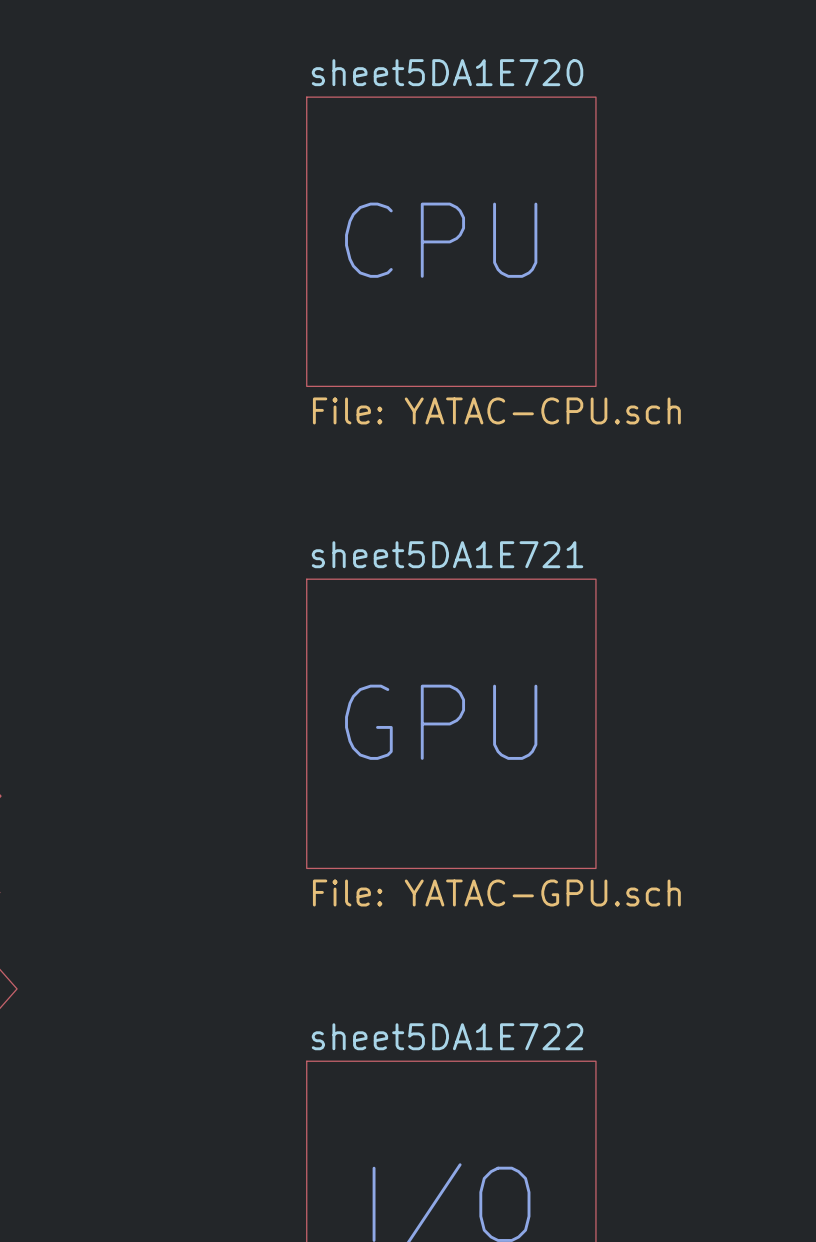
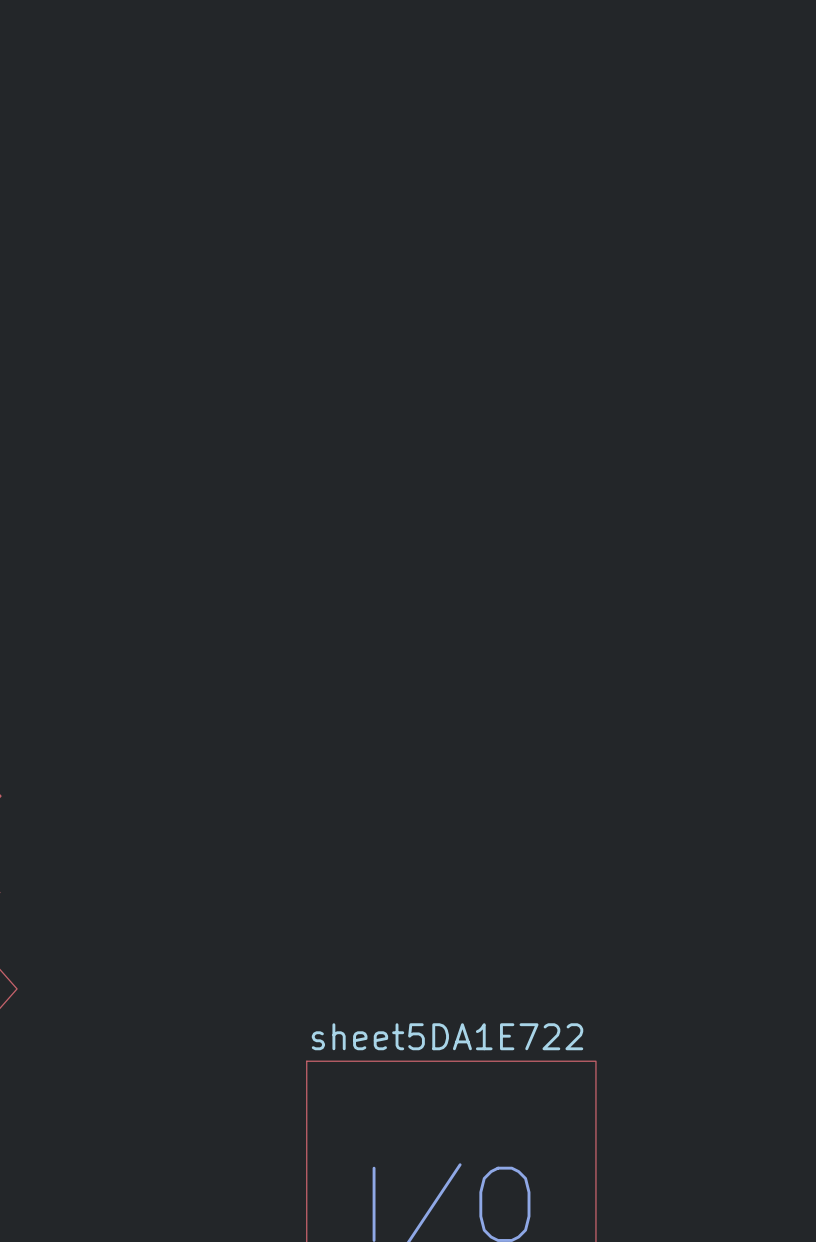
text: CPU (441, 240) -> none
sheet sheet5DA1E720: File: YATAC-CPU.sch (451, 241) -> none
text: GPU (441, 722) -> none
sheet sheet5DA1E721: File: YATAC-GPU.sch (451, 723) -> none

